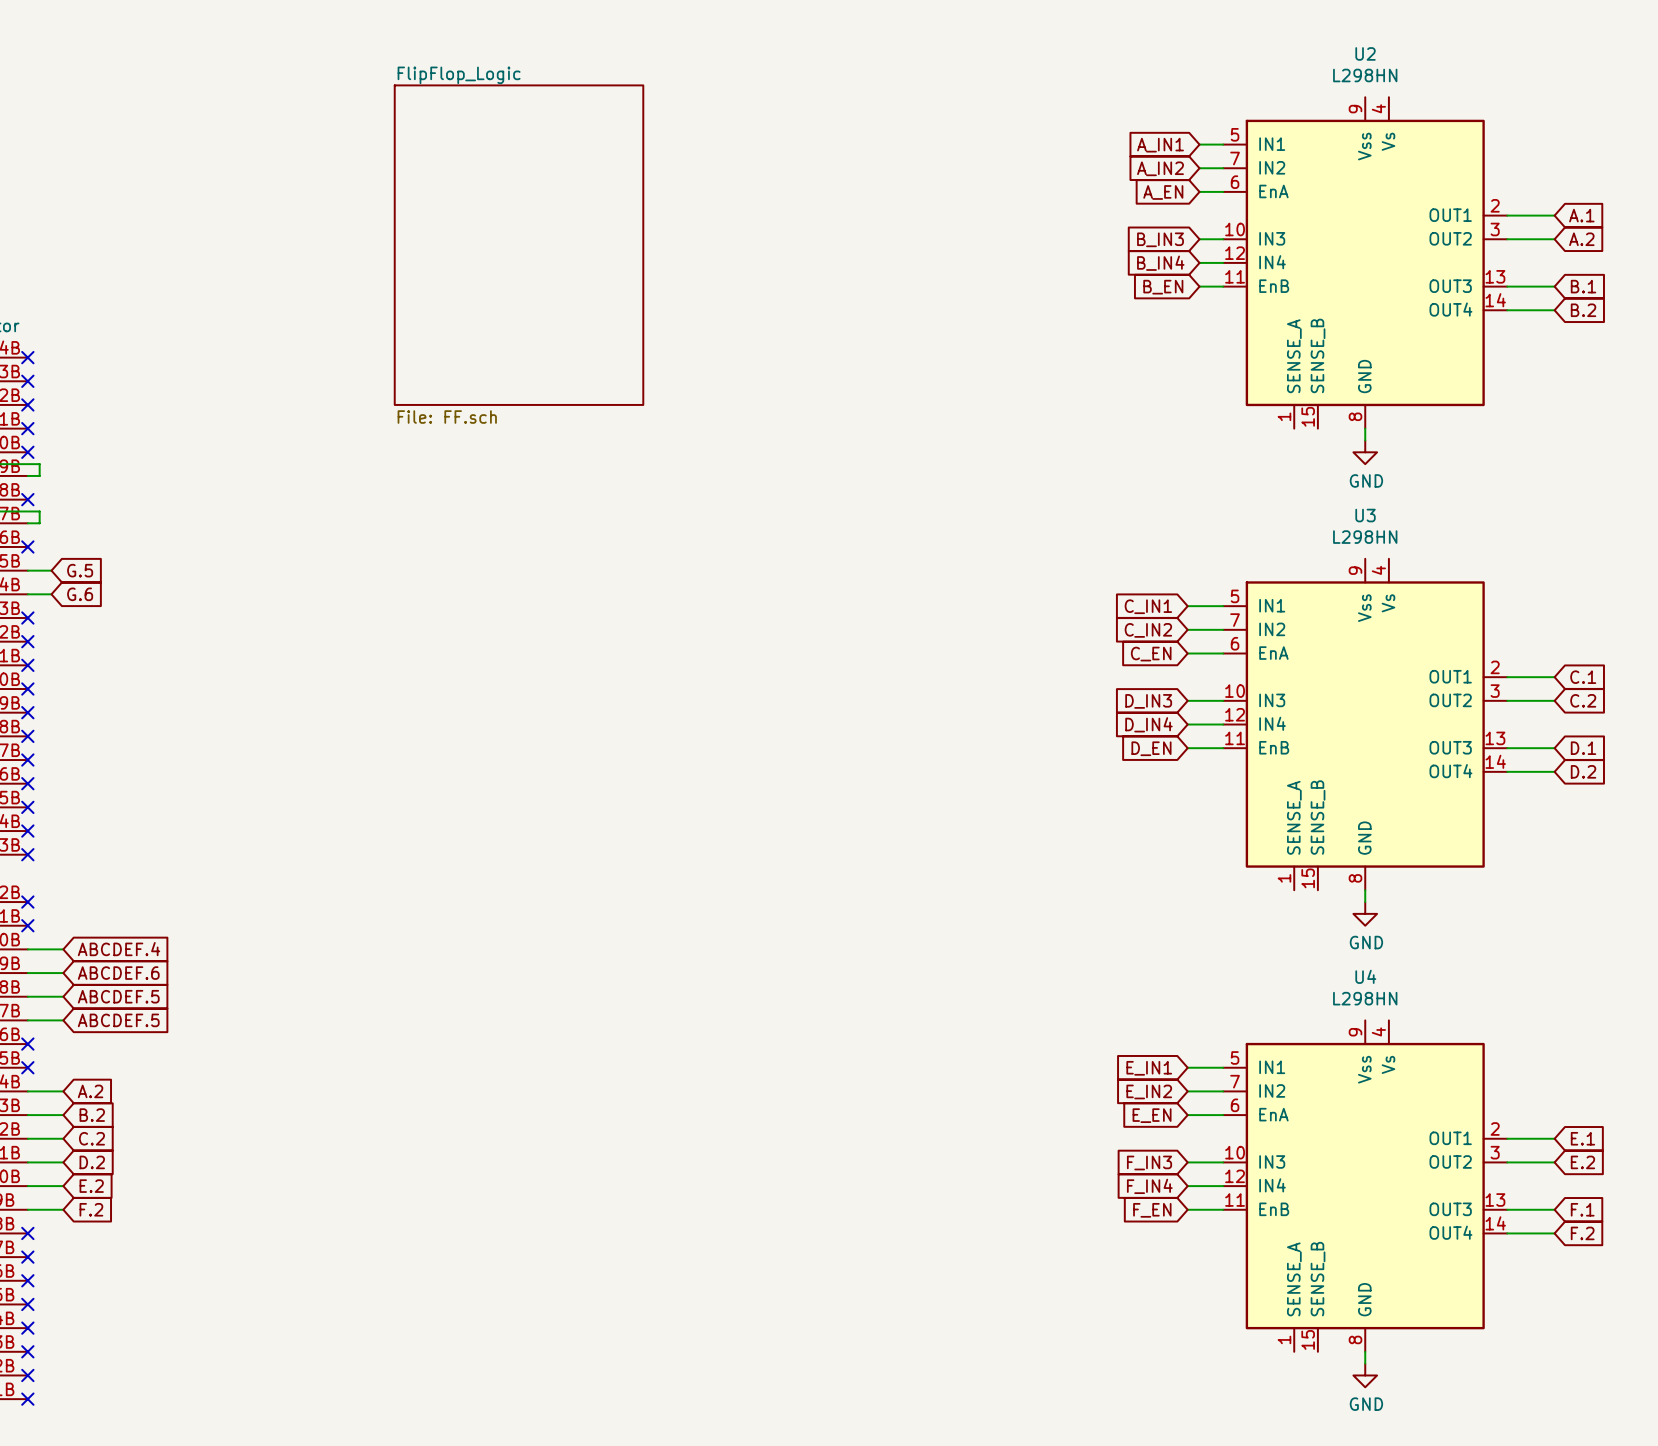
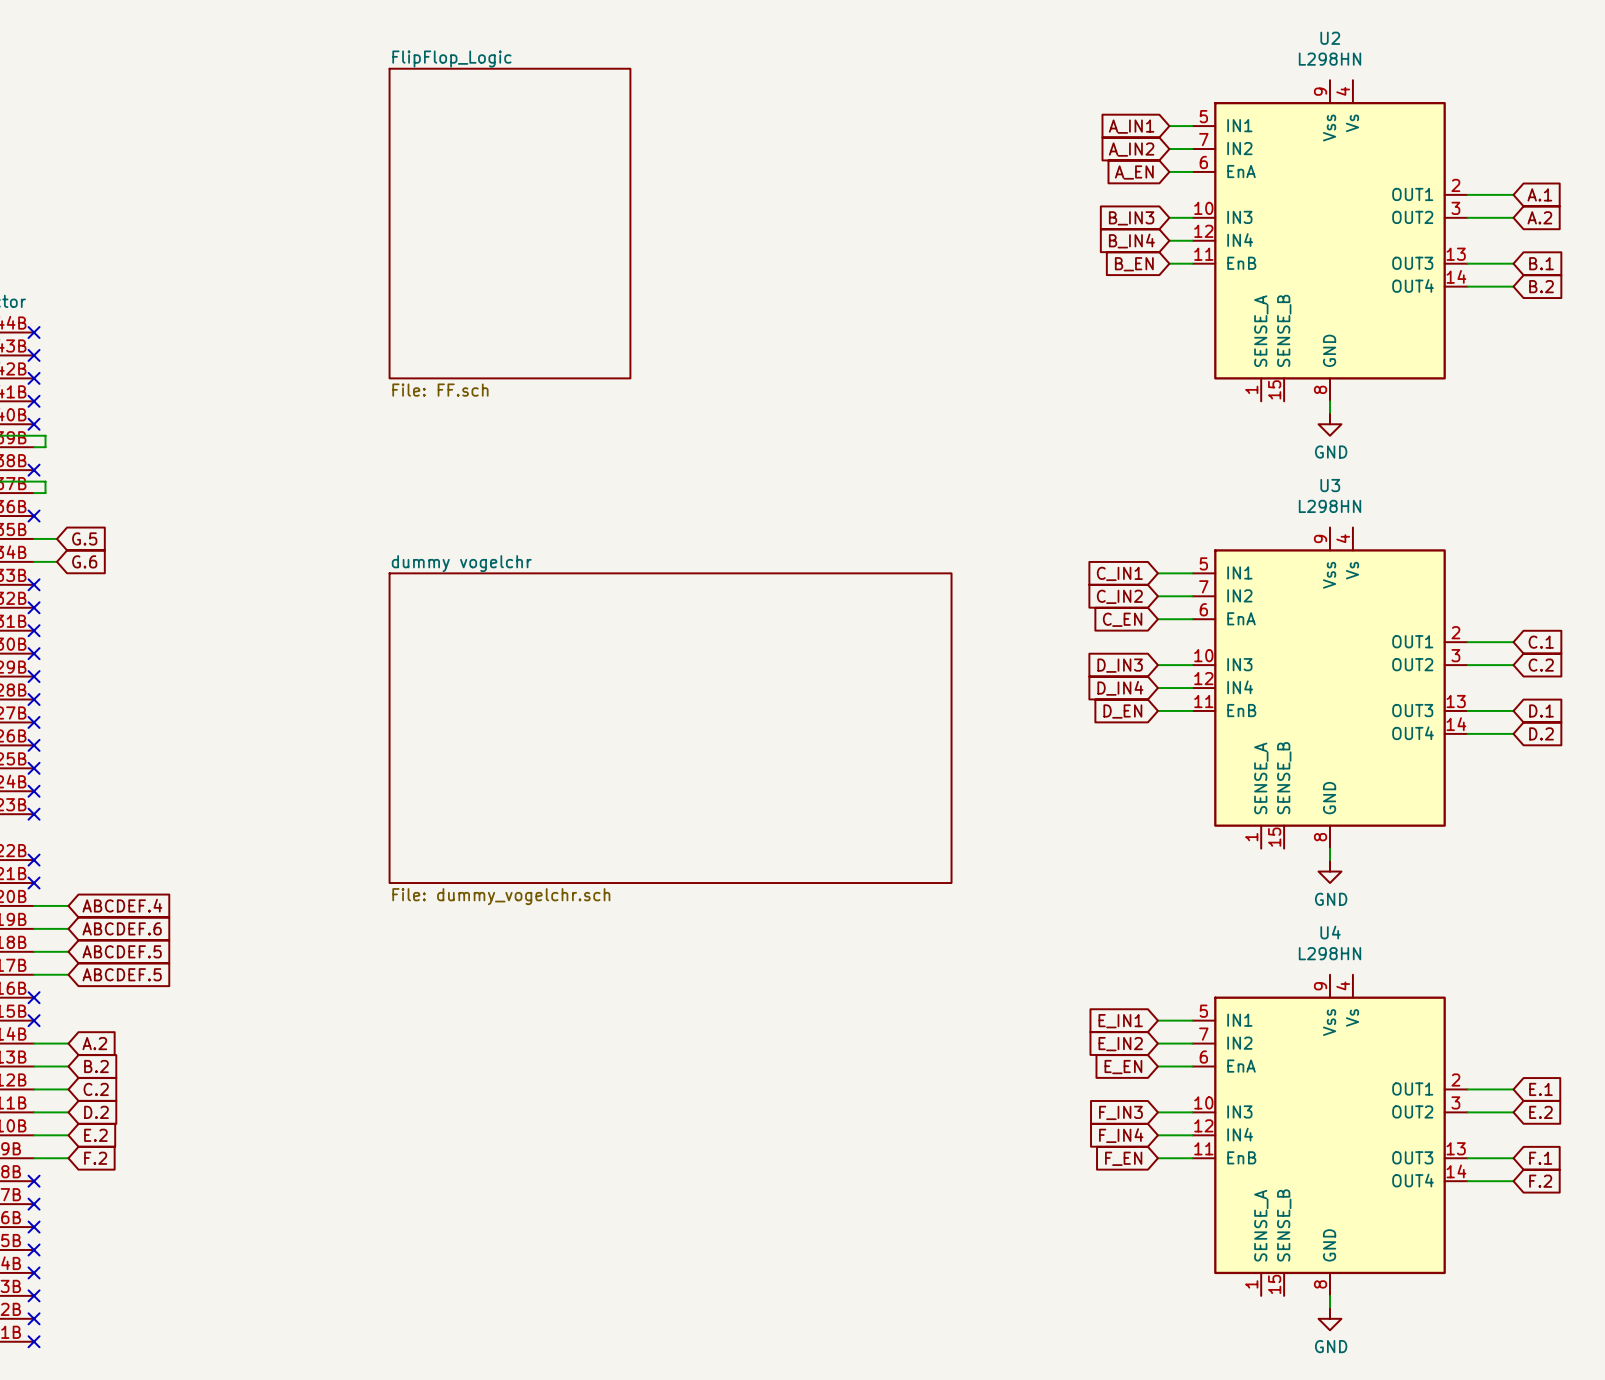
sheet dummy vogelchr: none -> File: dummy_vogelchr.sch (670, 728)

